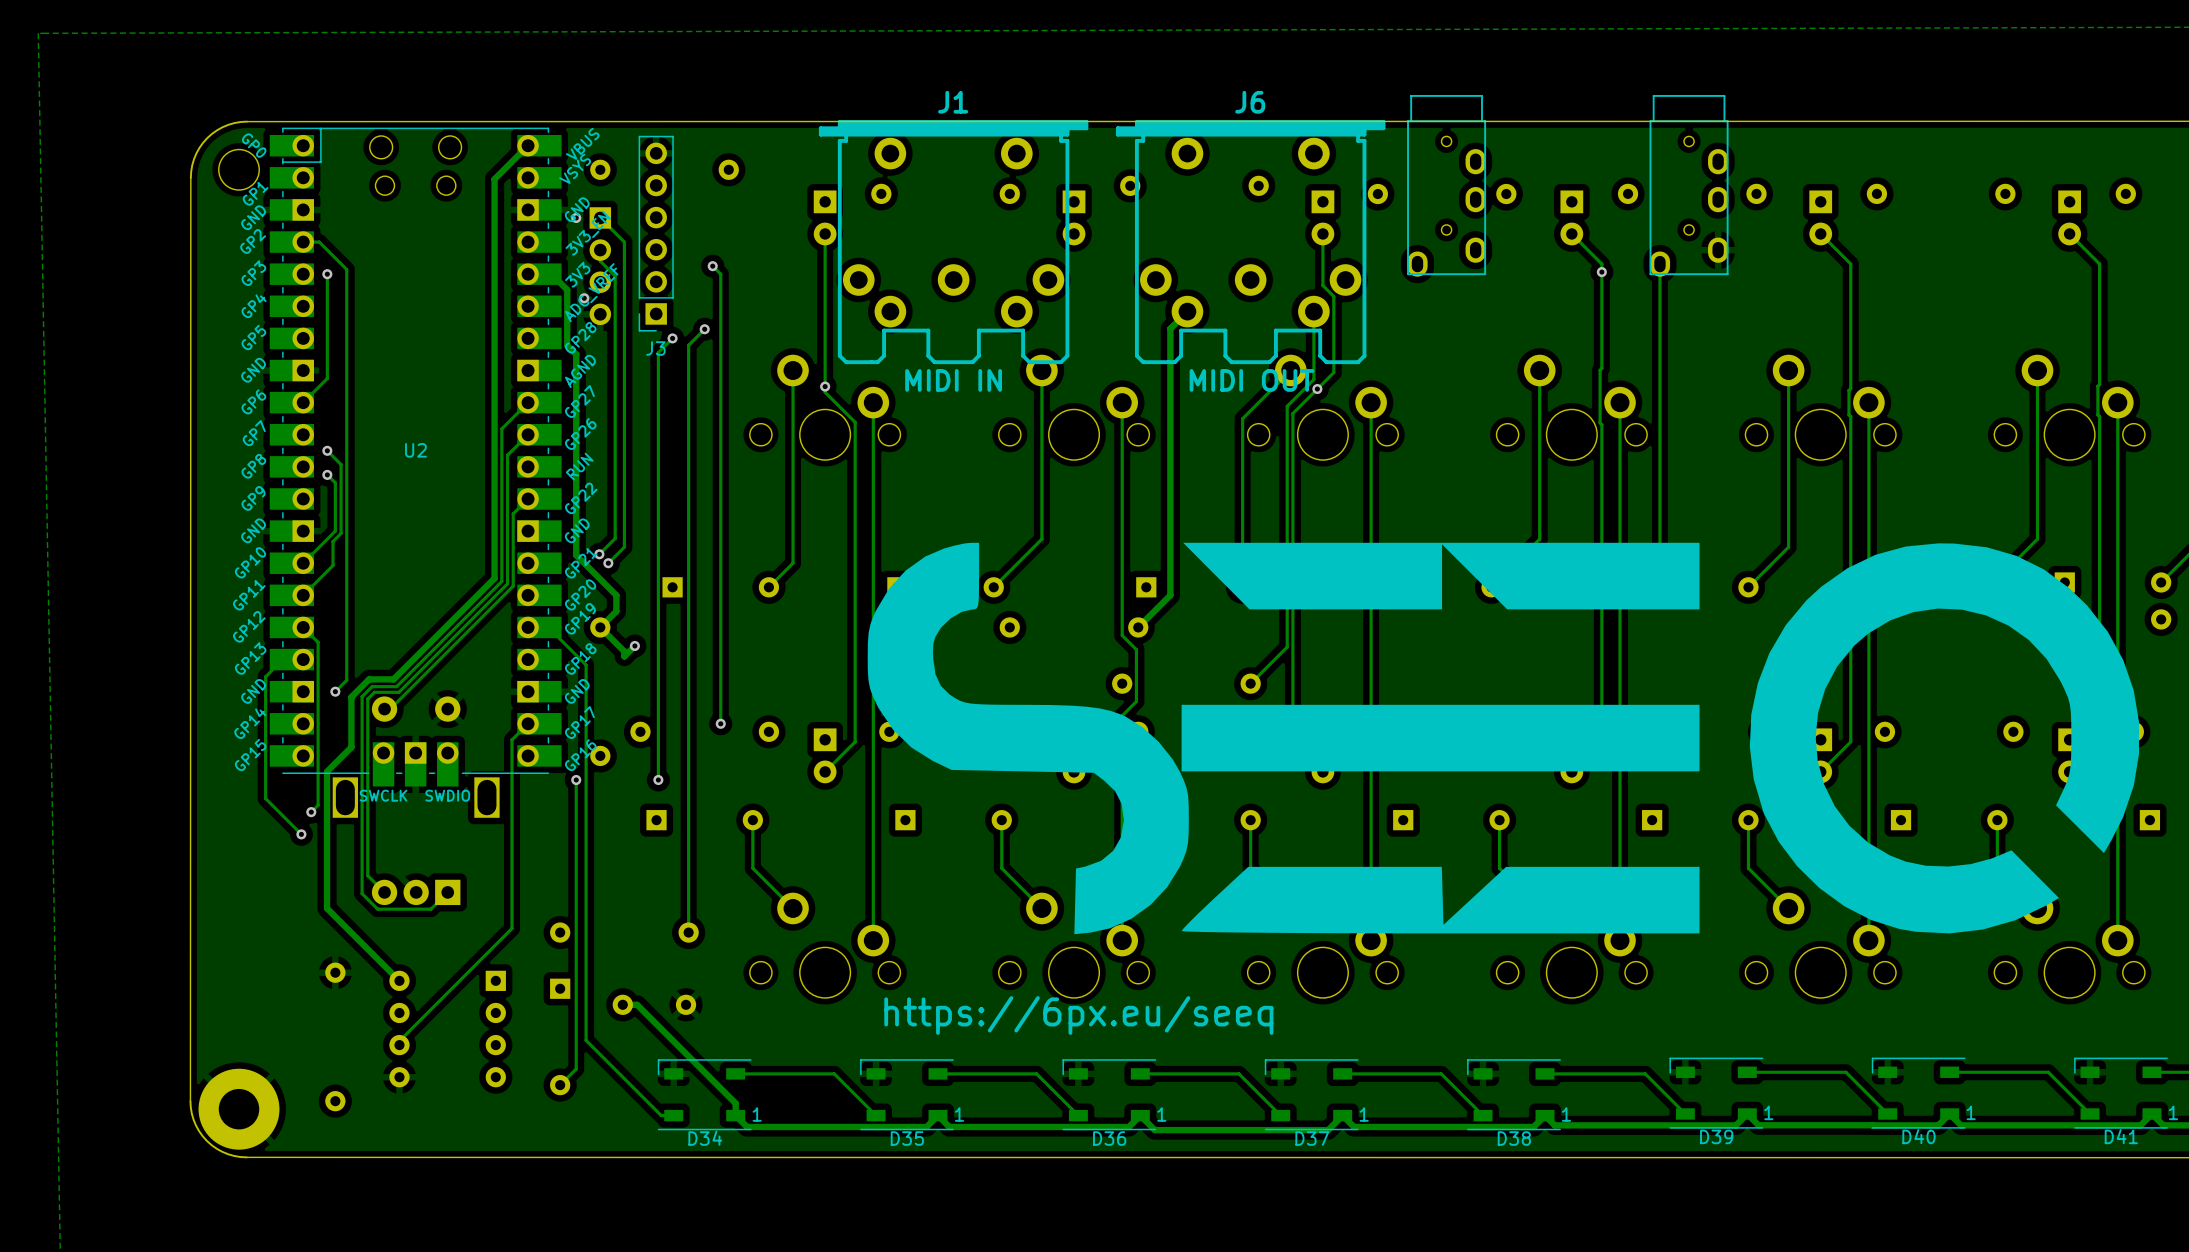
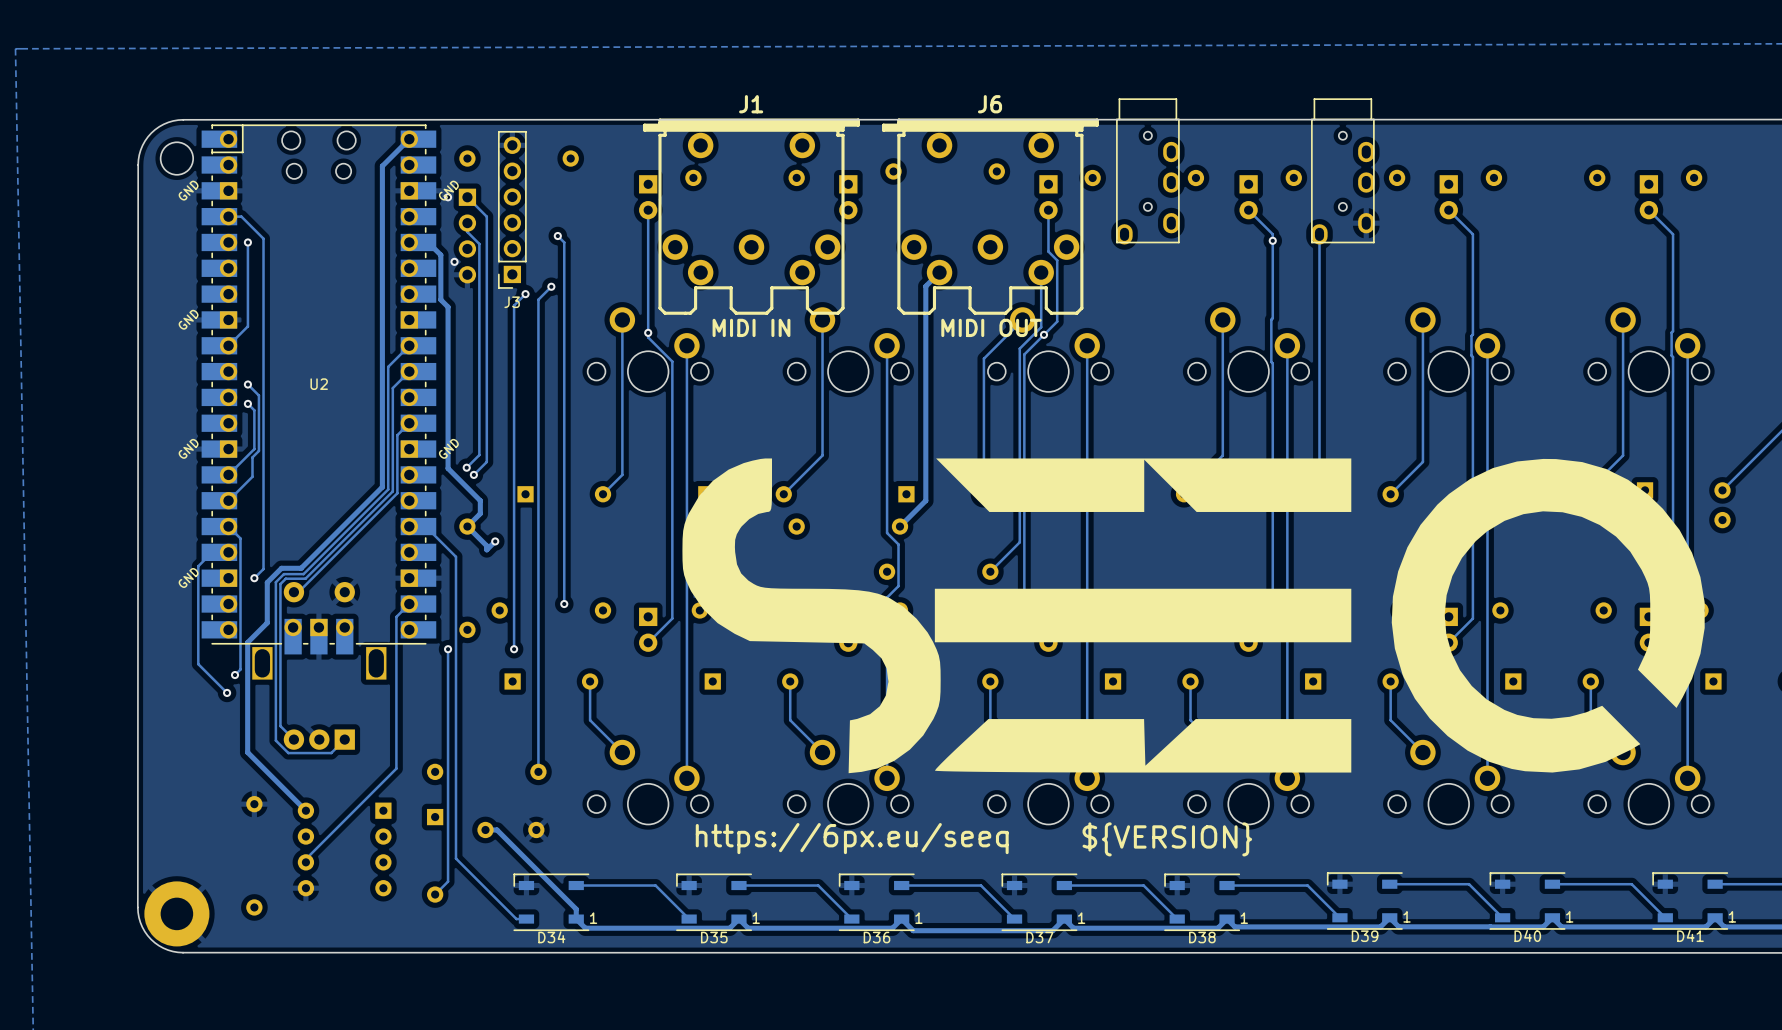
U2 footprint: [269, 127, 562, 787] -> [201, 124, 437, 655]
text: none -> ${VERSION} (1167, 839)

